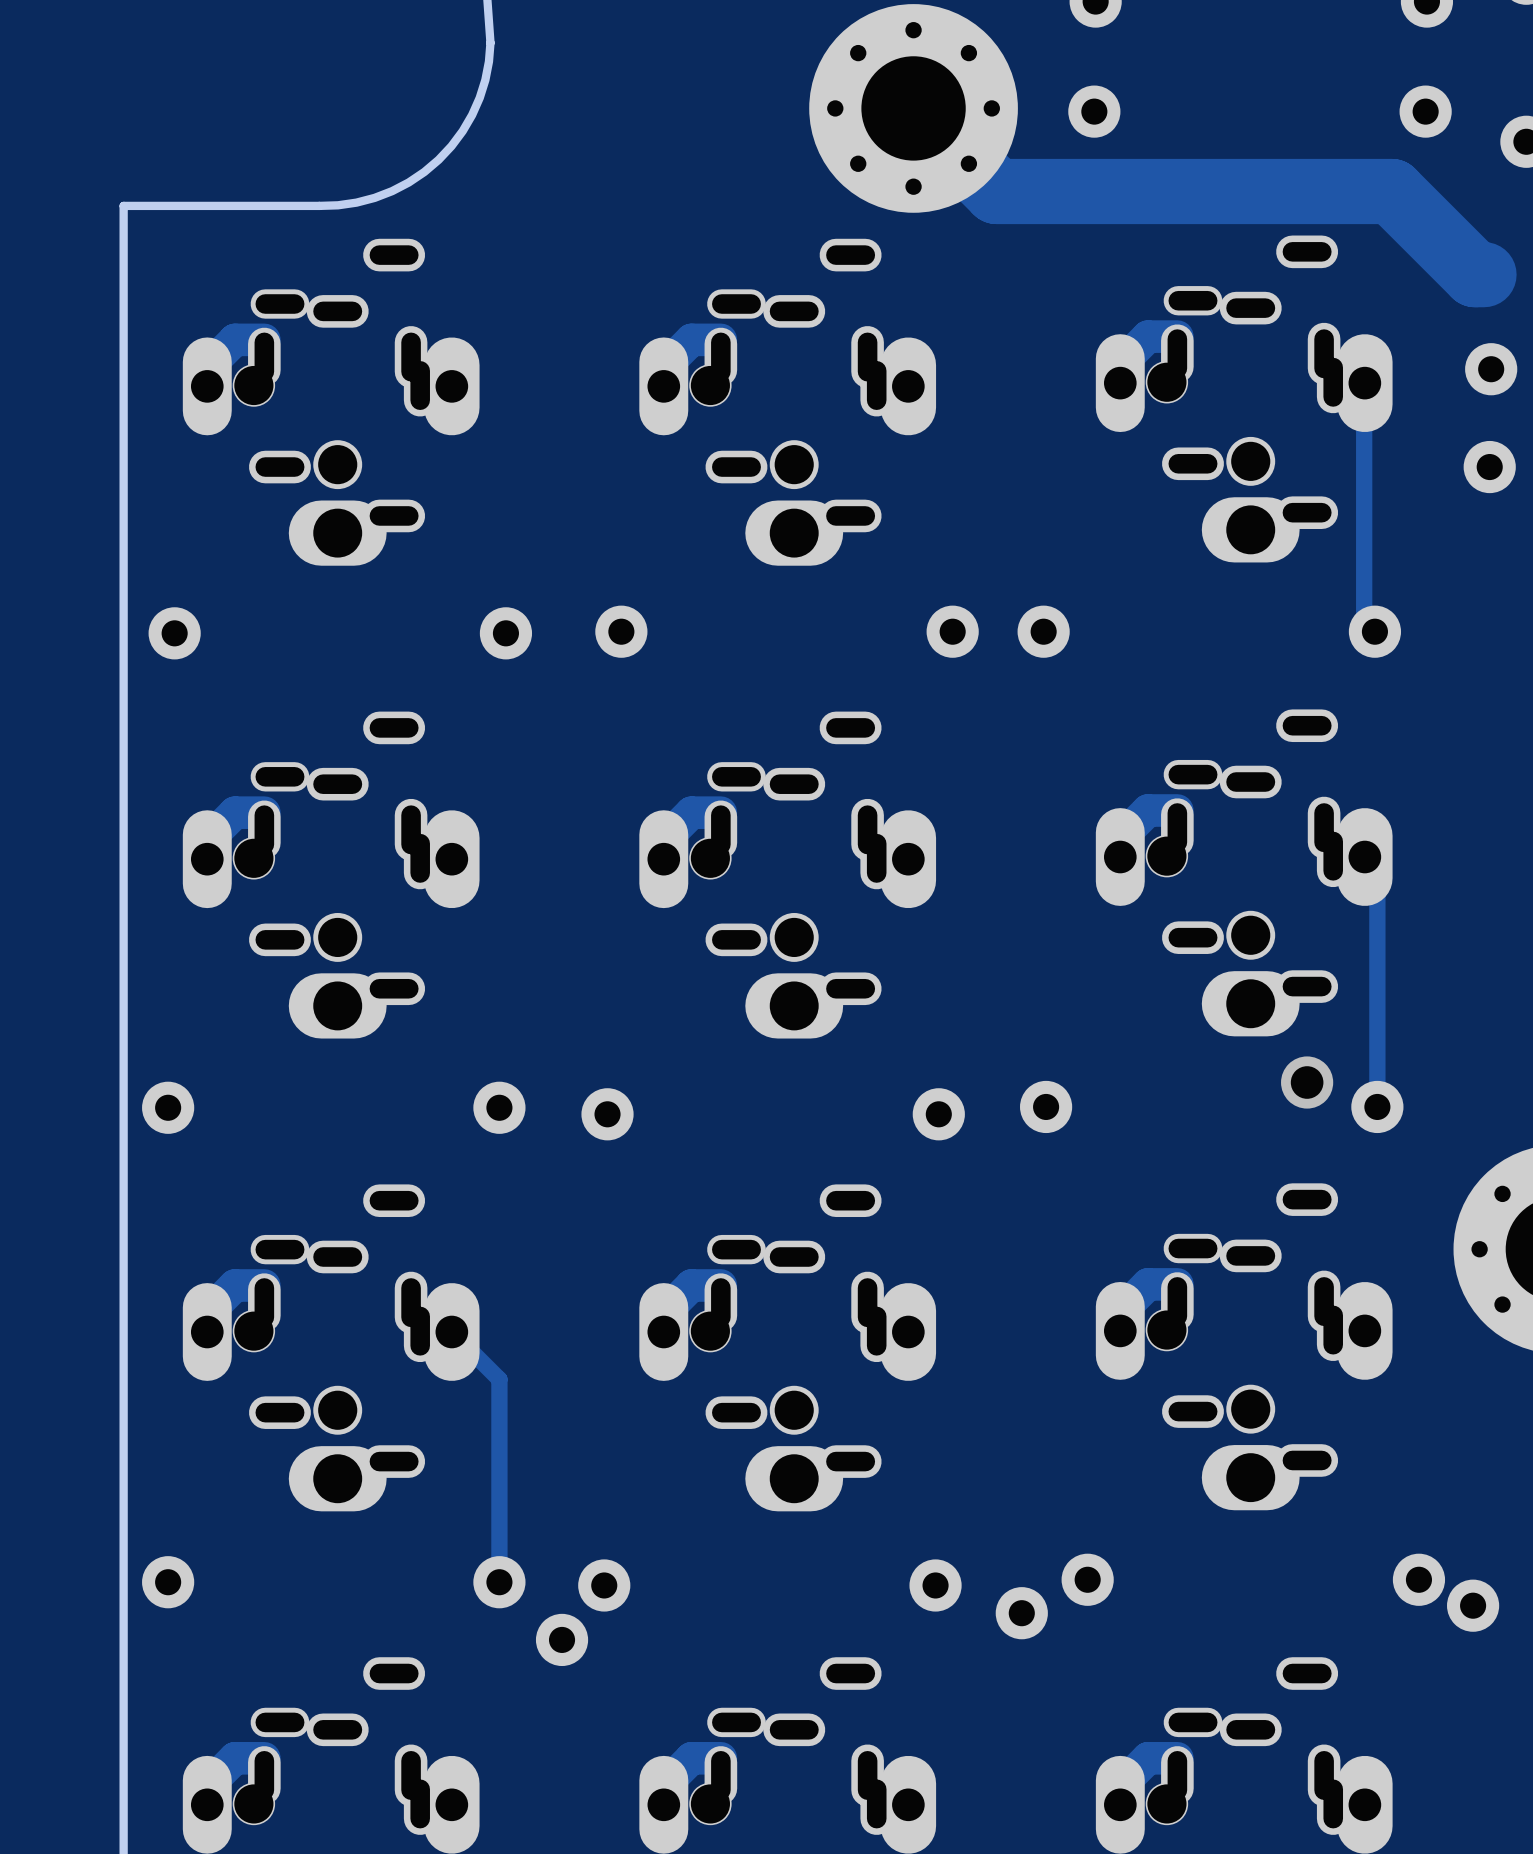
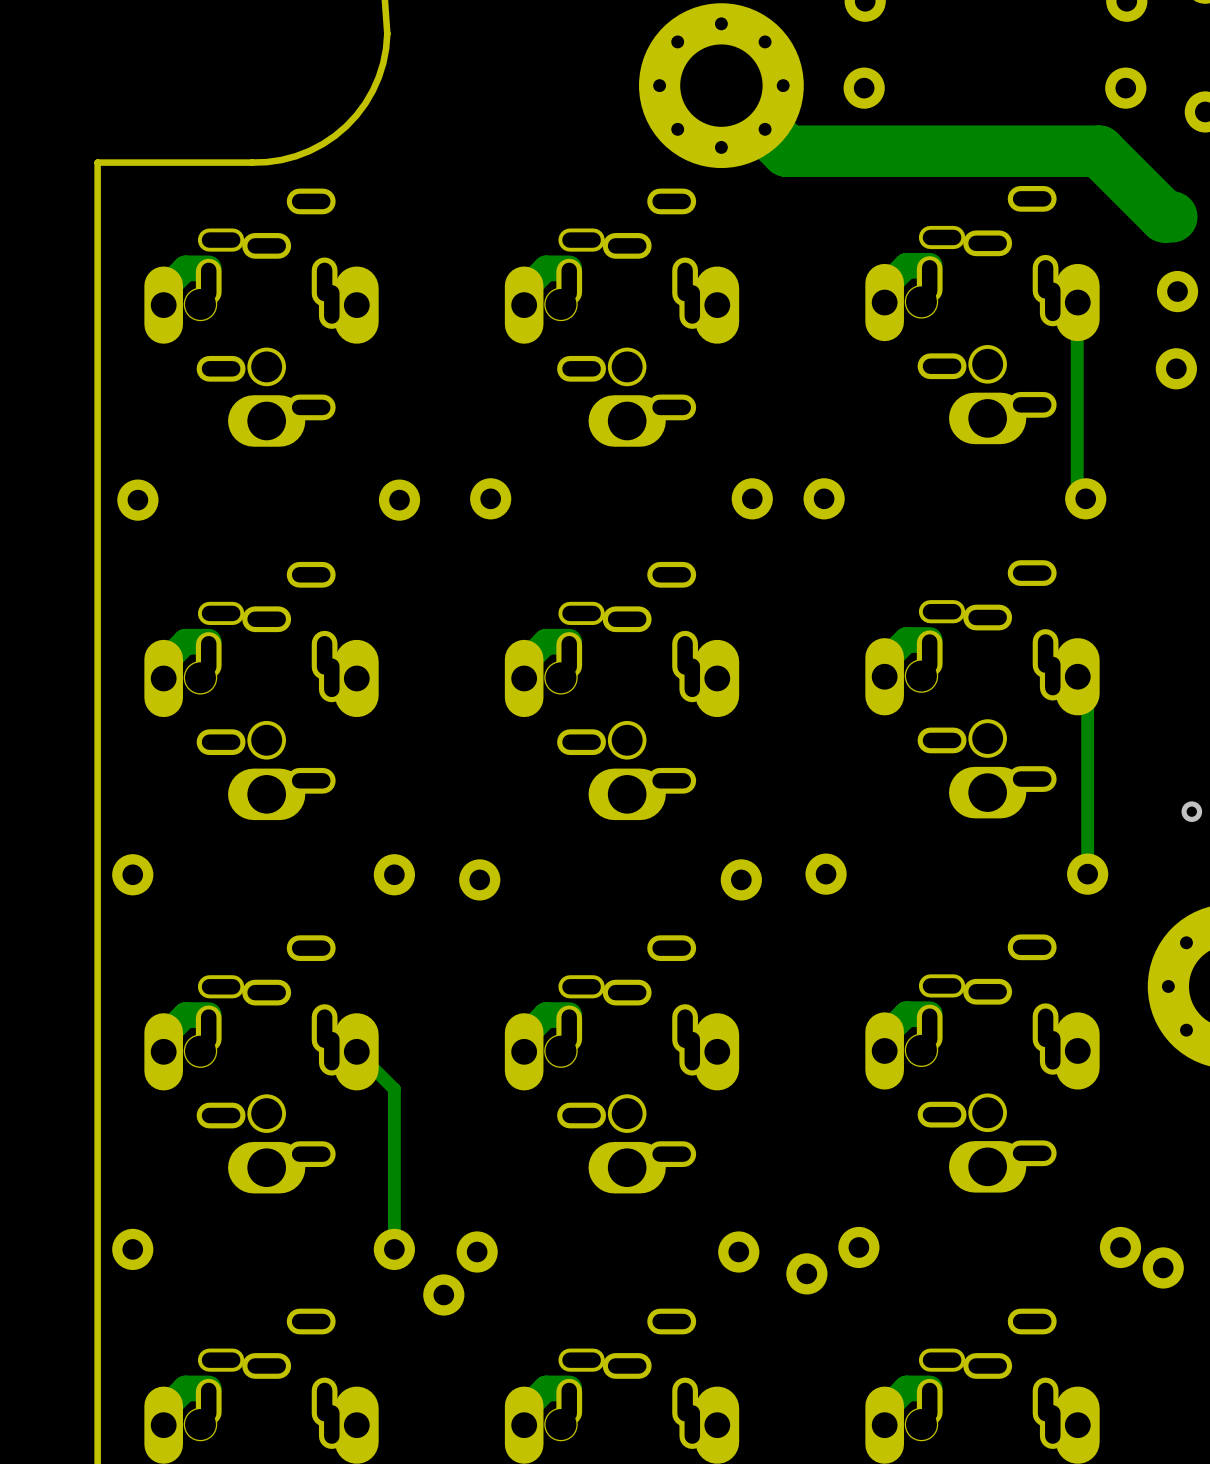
via: none -> (1191, 811)
via: (1307, 1082) -> none

